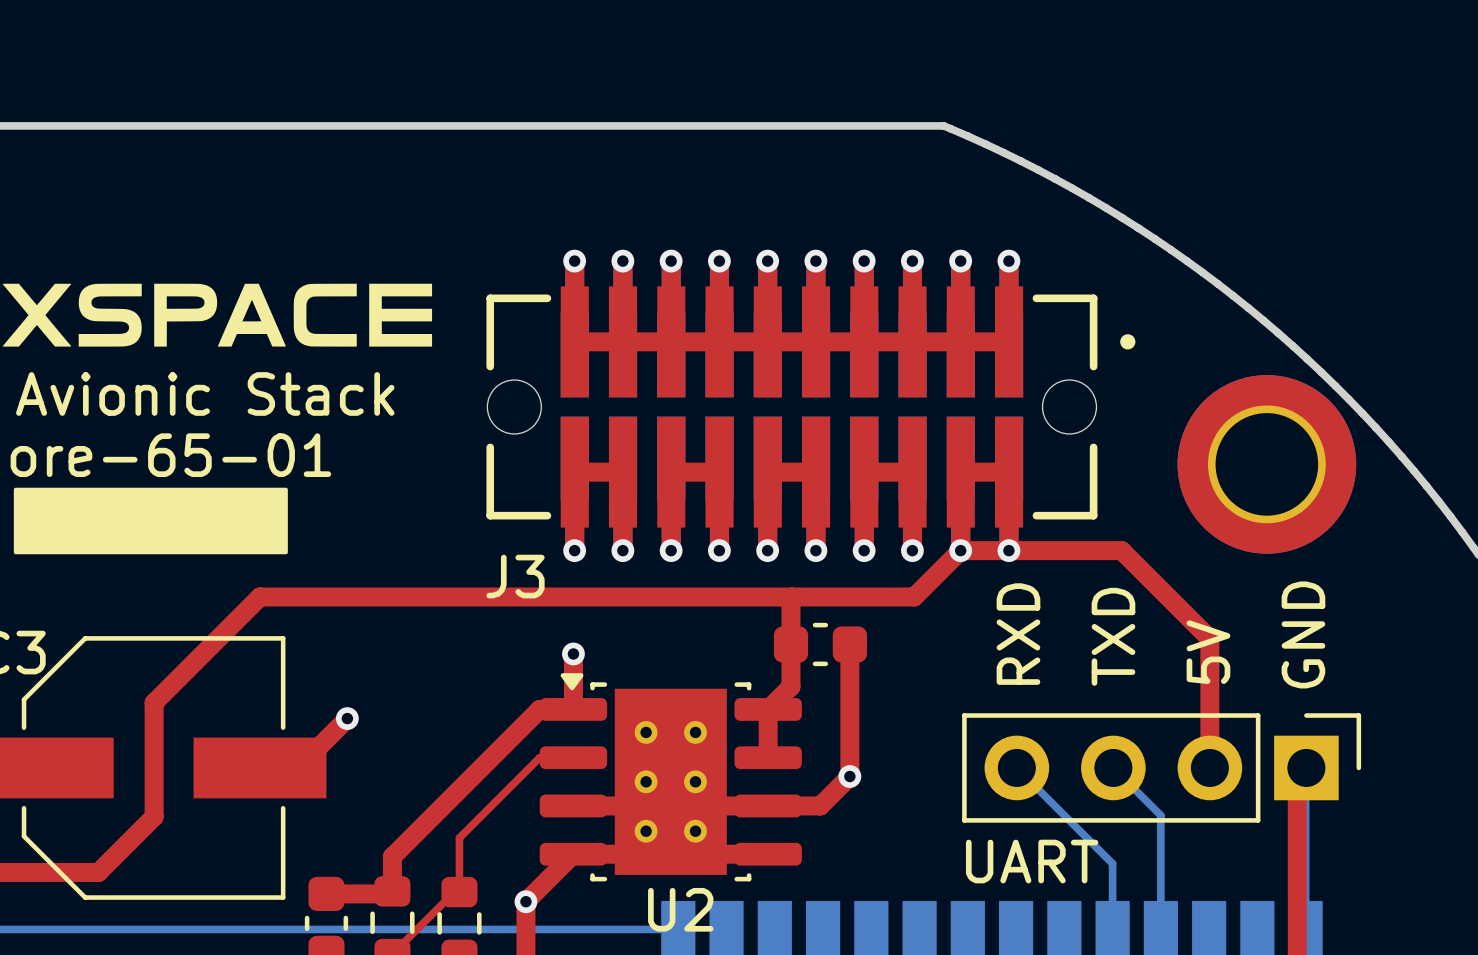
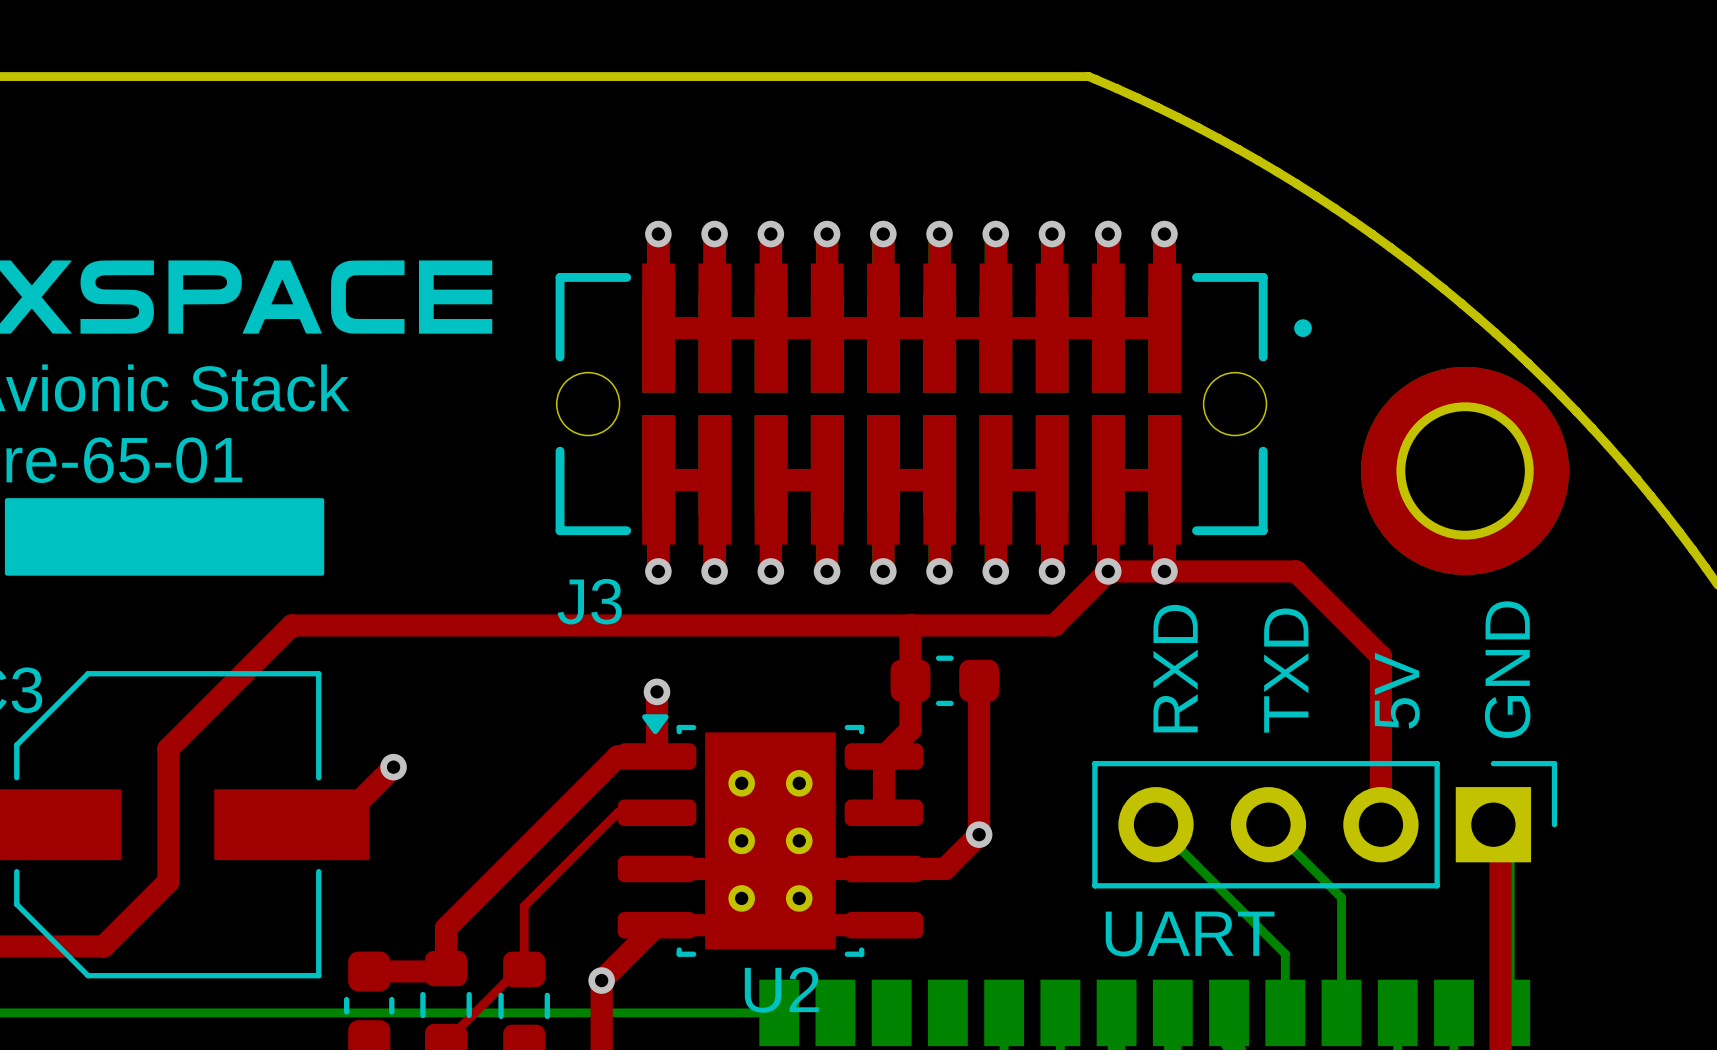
top track: (1194, 623) (1209, 638) (1209, 767) -> (1380, 656) (1380, 824)
bottom track: (1016, 767) (1112, 863) (1112, 878) -> (1156, 824) (1285, 953)
bottom track: (1113, 767) (1160, 815) (1160, 830) -> (1268, 824) (1341, 897)
part position: (1161, 767) -> (1324, 824)

